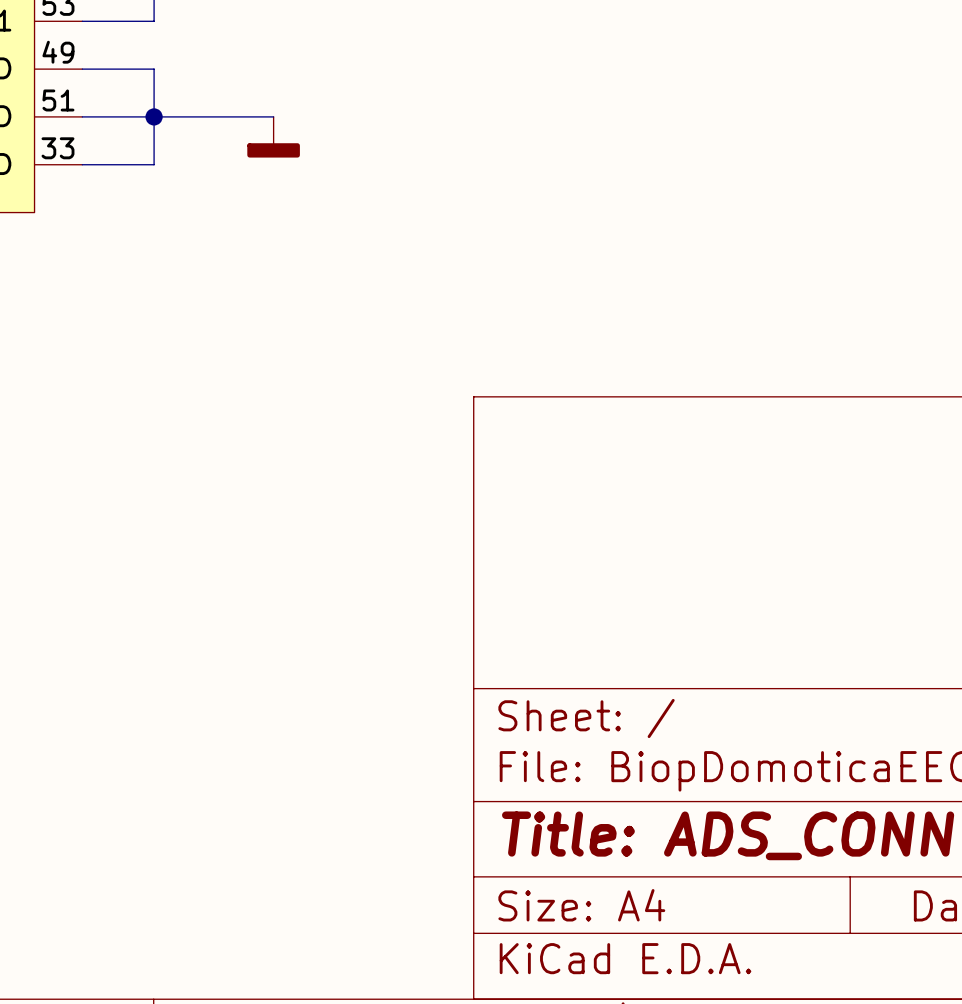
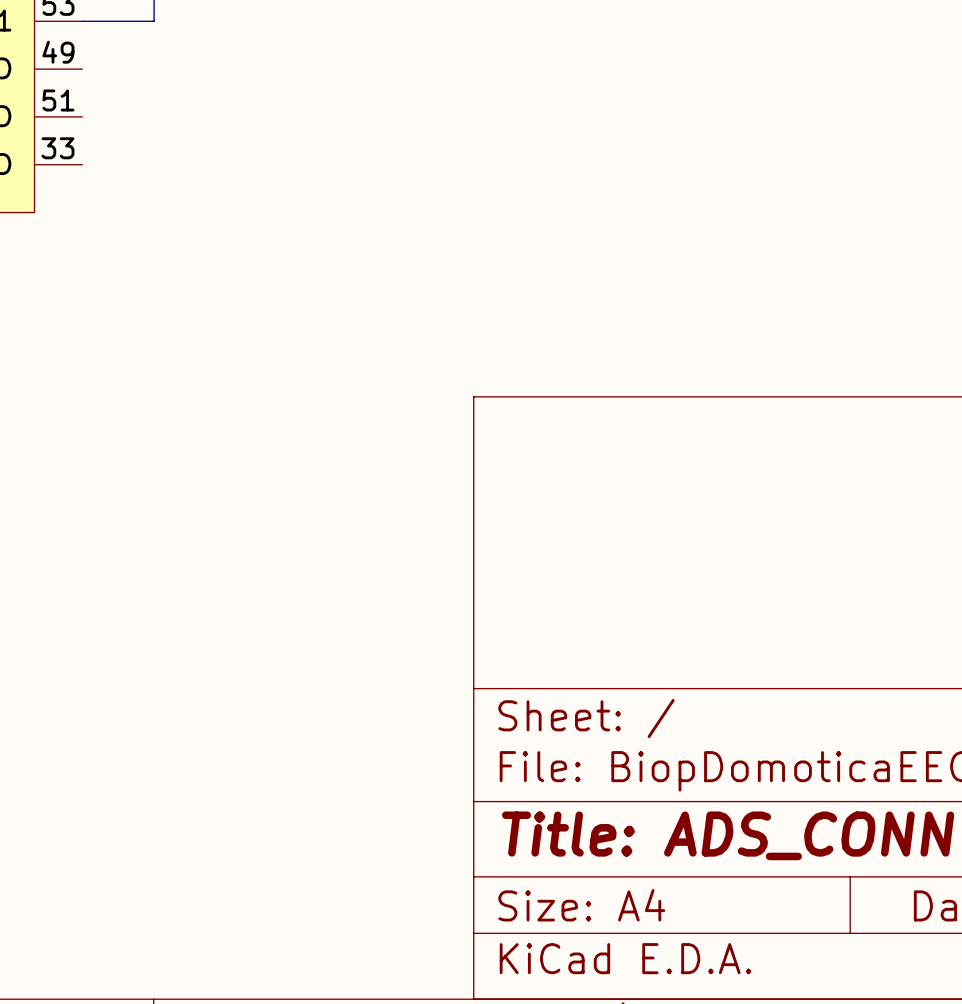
wire: (82, 69) (154, 69) (154, 164) (82, 164) -> none
wire: (82, 116) (273, 116) -> none
junction: (154, 116) -> none
power symbol: (273, 137) -> none

